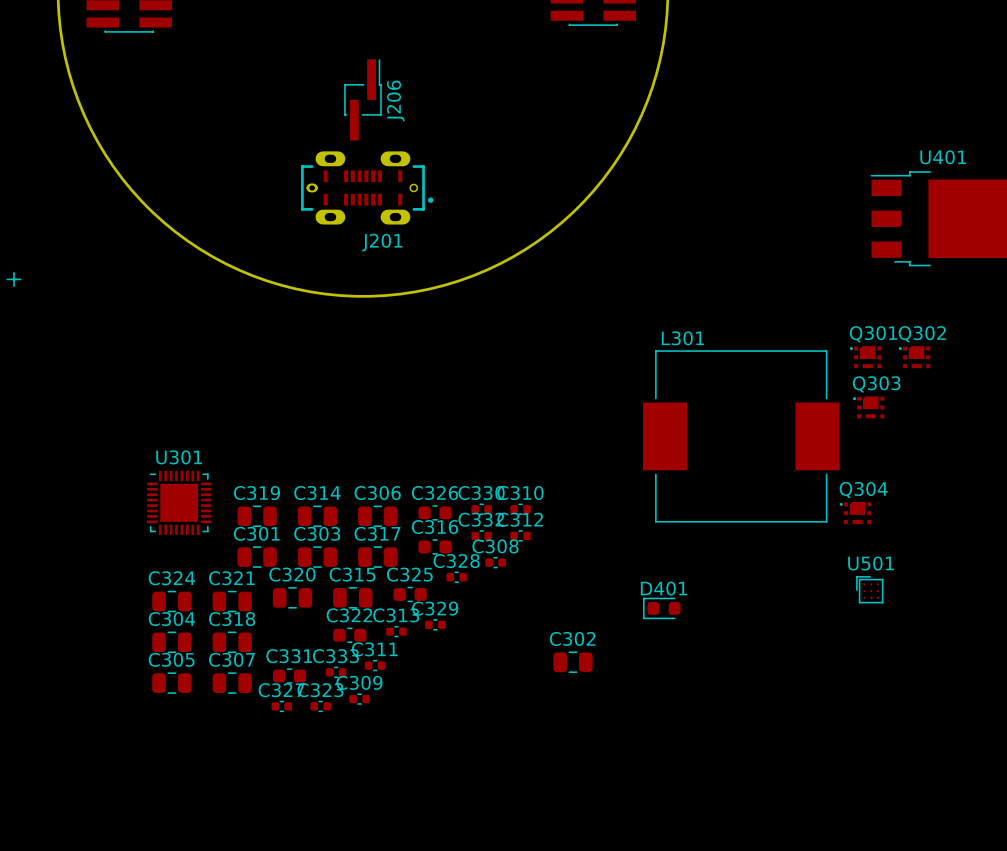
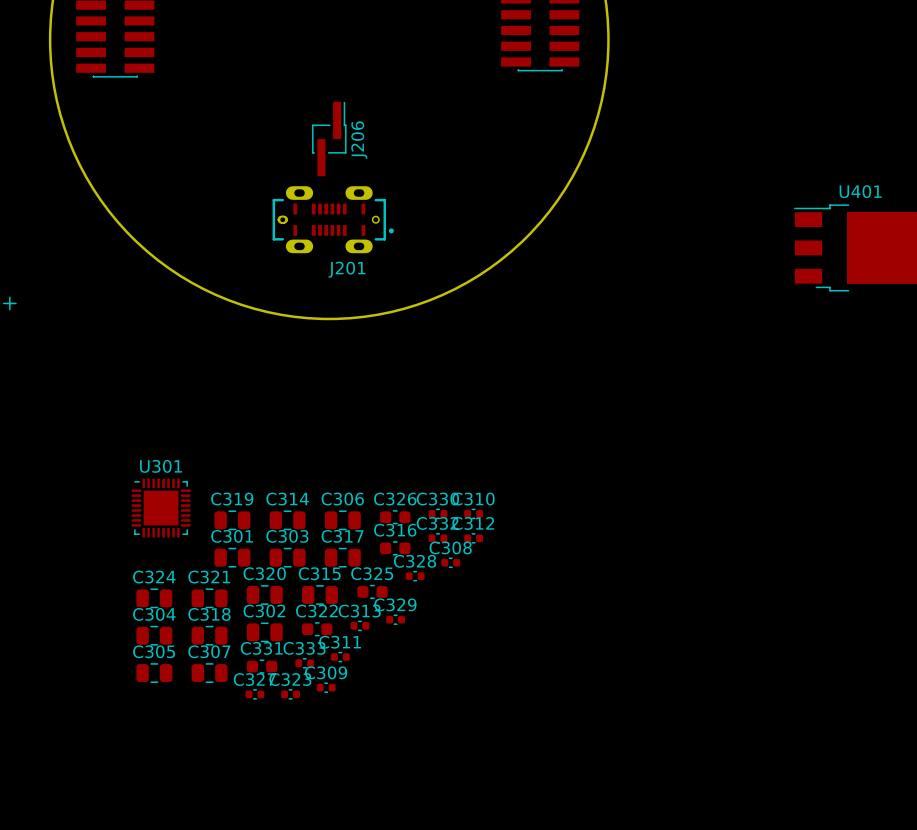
Q301: (865, 357) -> none
Q302: (914, 357) -> none
Q303: (868, 407) -> none
L301: (741, 436) -> none
Q304: (855, 513) -> none
U501: (869, 589) -> none
D401: (661, 608) -> none
C302 position: (573, 662) -> (264, 632)

